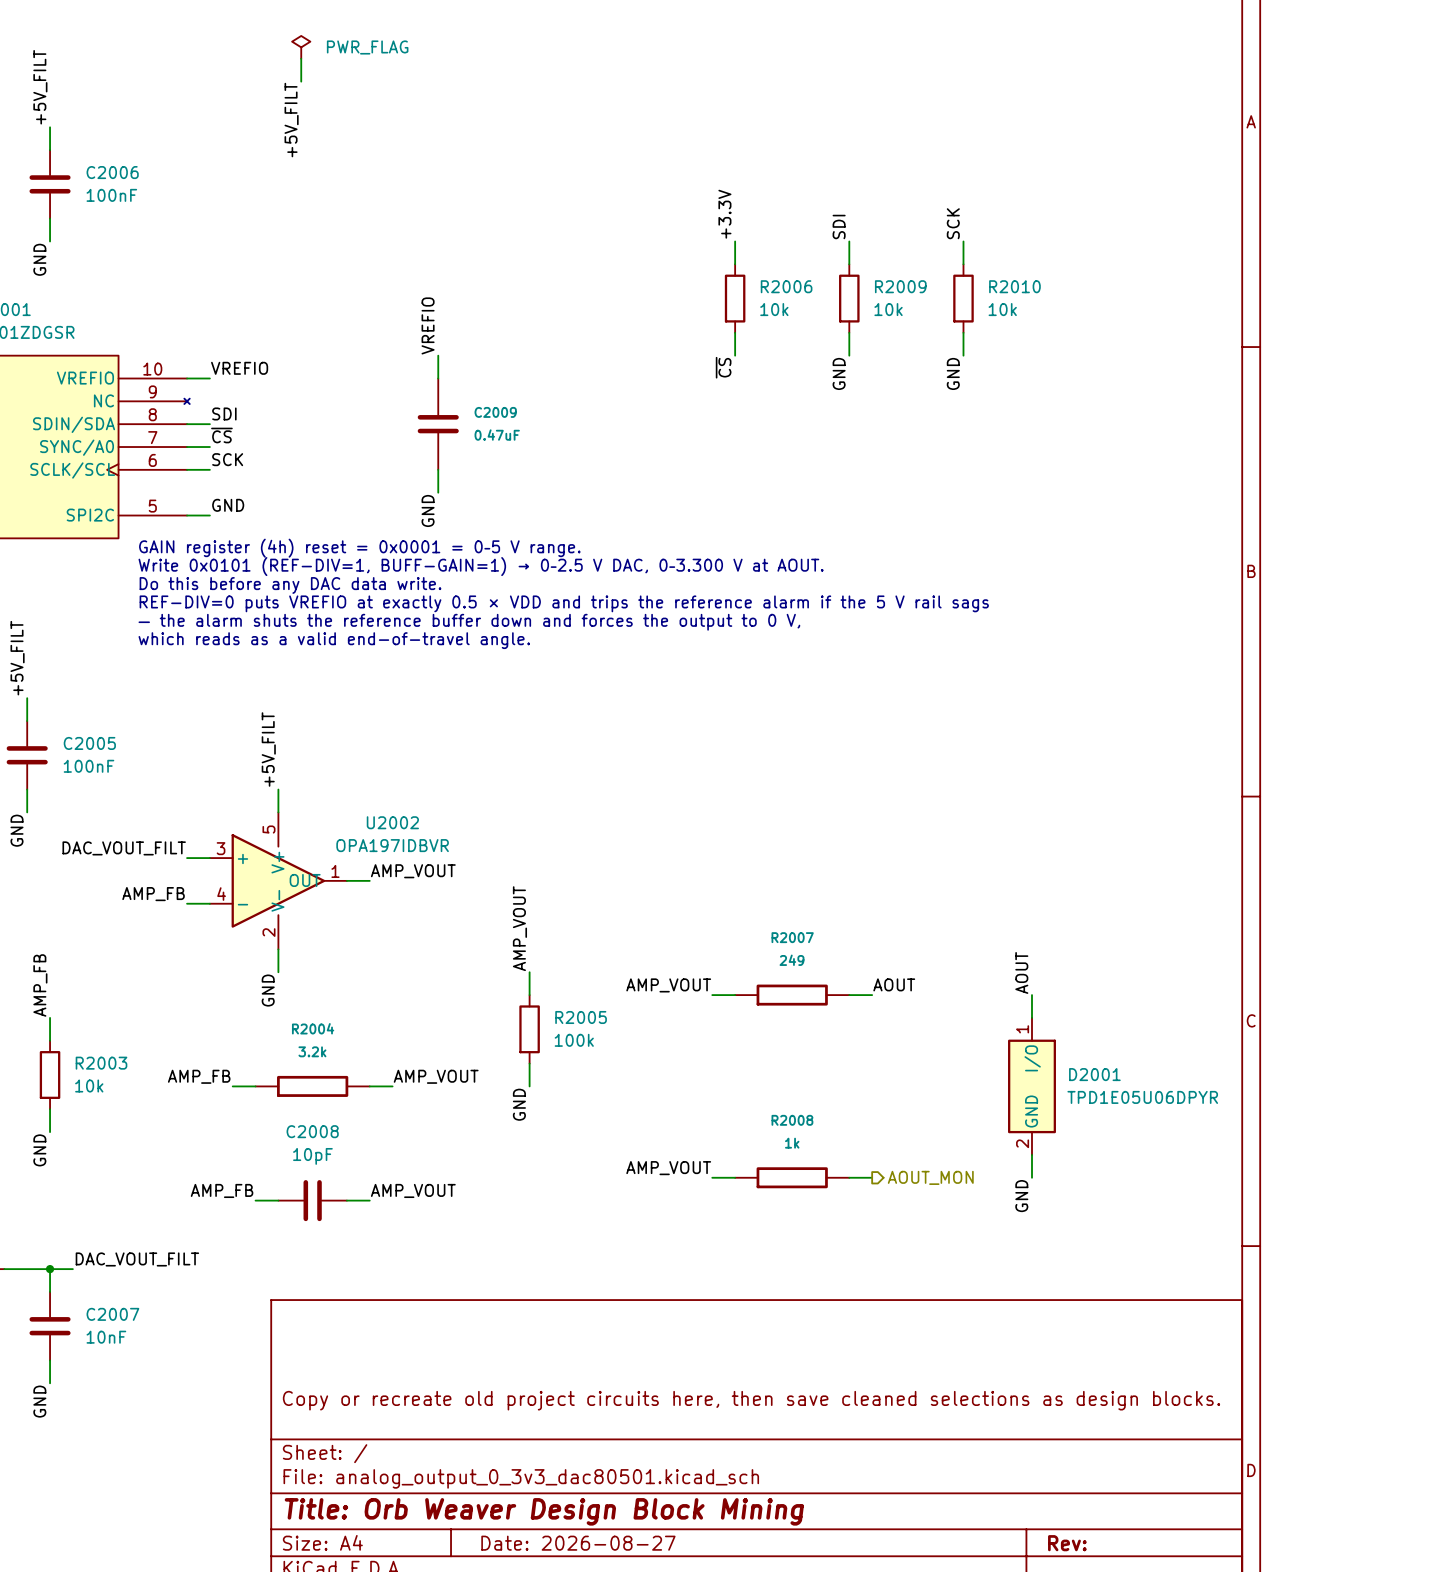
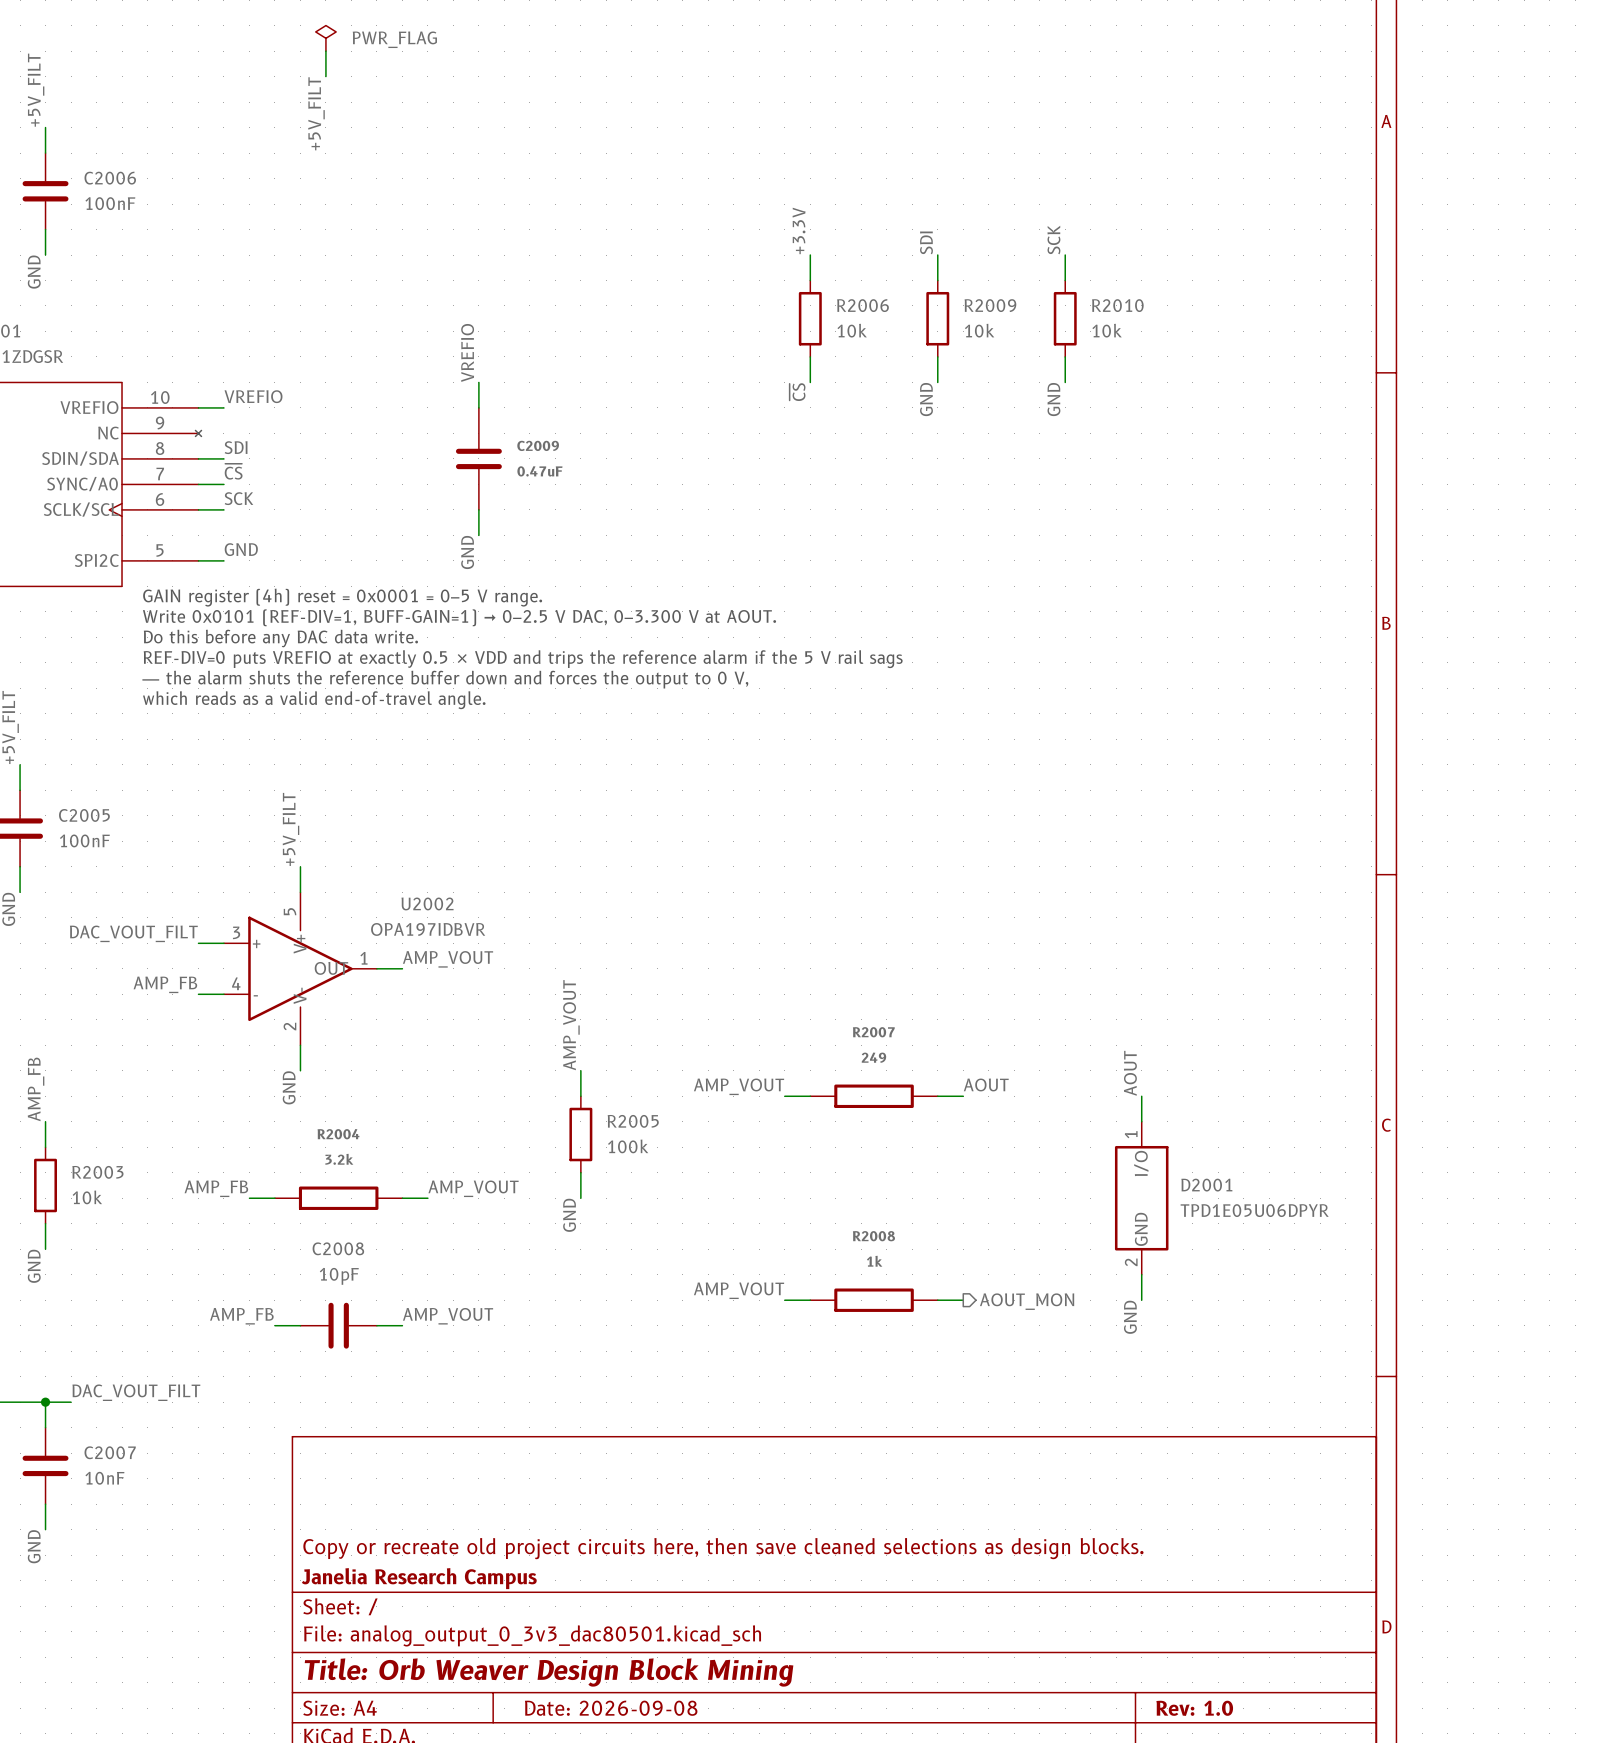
title block: none -> Janelia Research Campus (419, 1578)
title block: Date: 2026-08-27 (578, 1543) -> Date: 2026-09-08 (611, 1708)
title block: Rev: (1067, 1543) -> Rev: 1.0 (1194, 1708)

